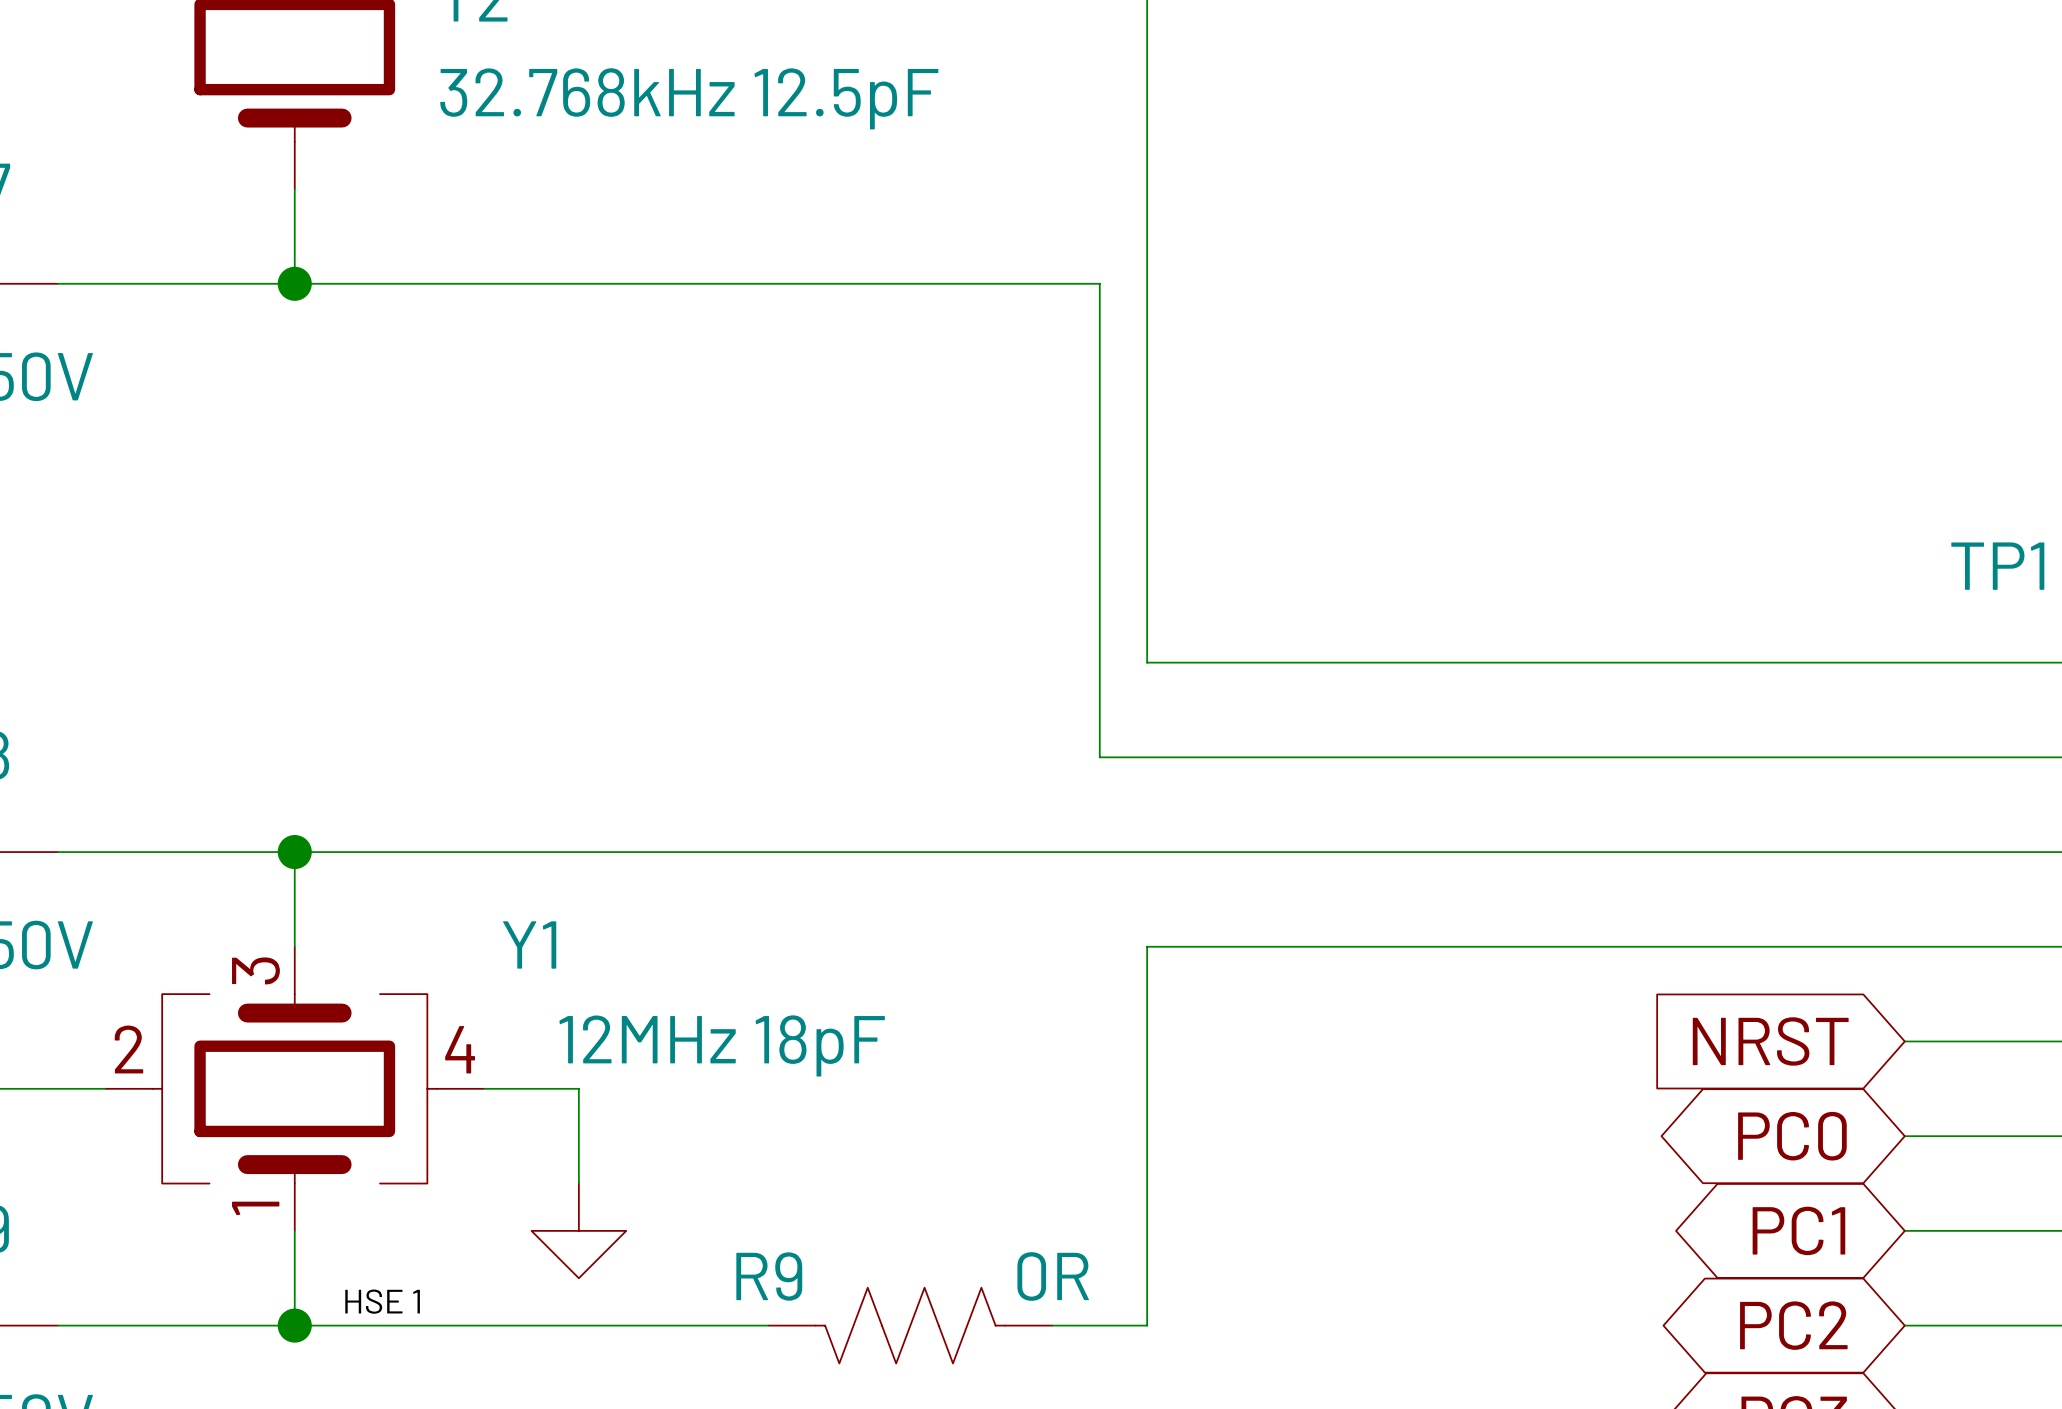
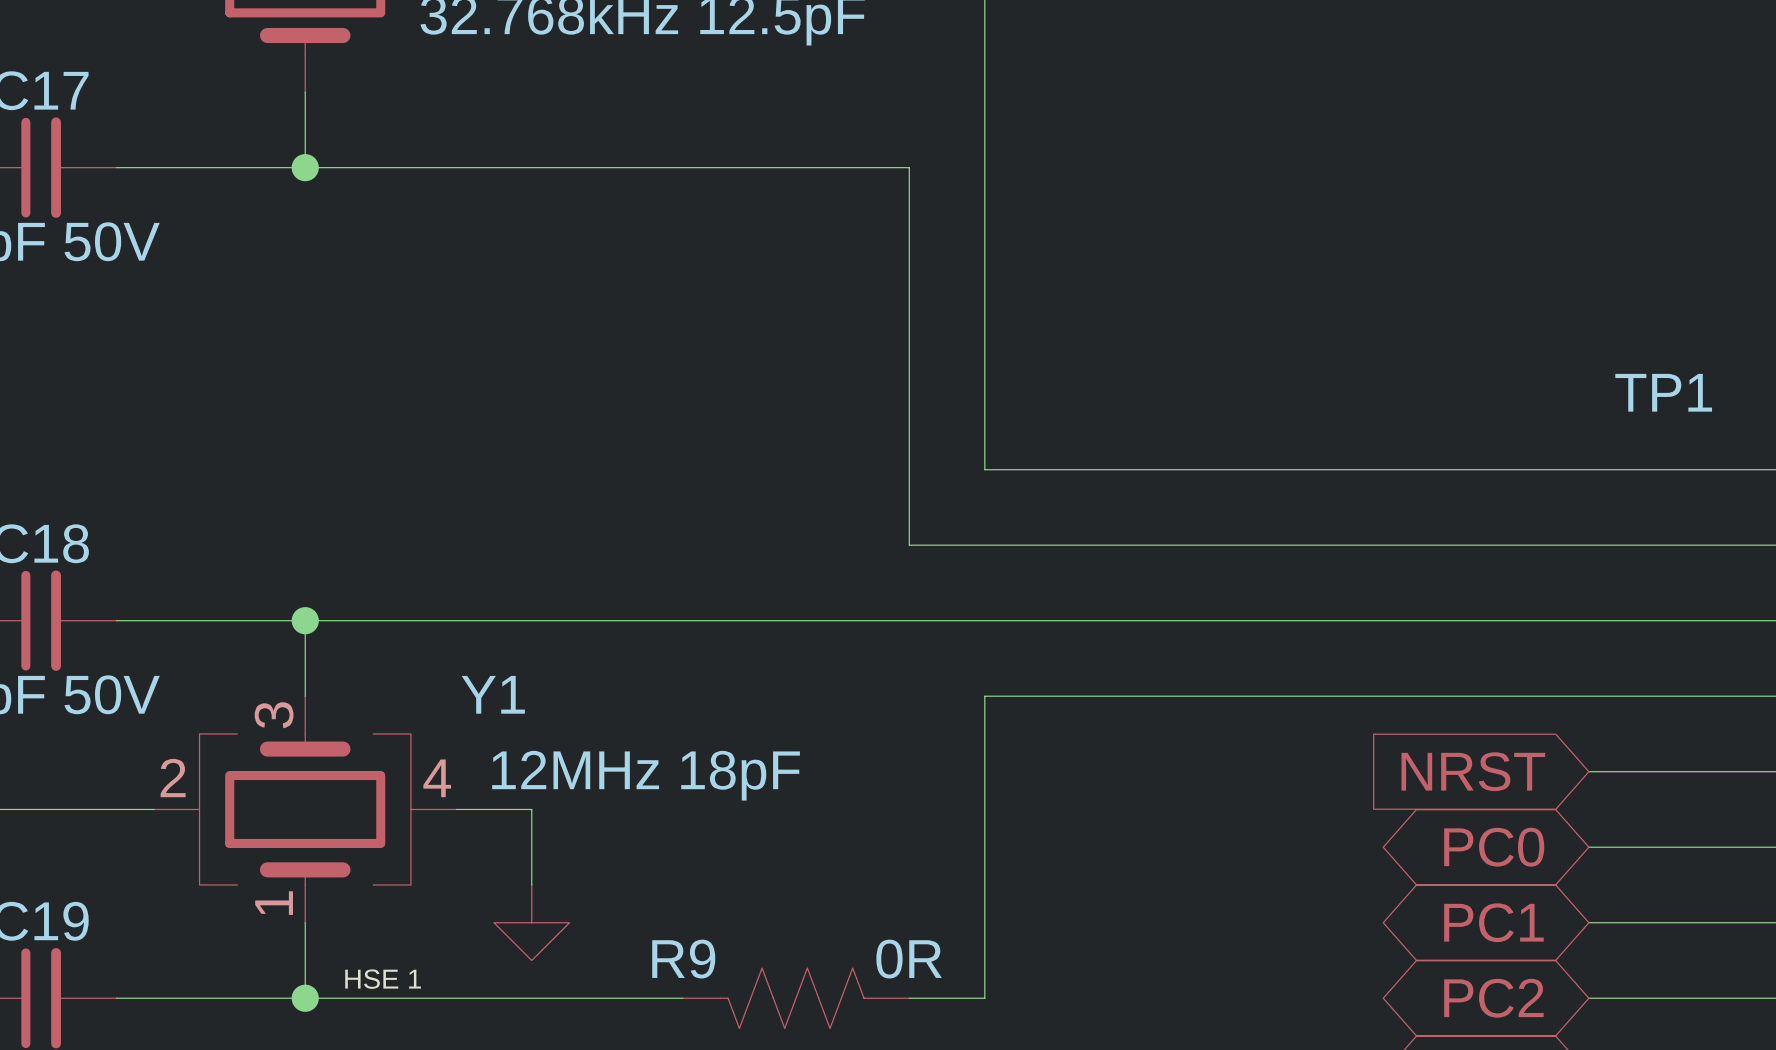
wire: (1052, 283) (1099, 283) (1099, 757) -> (909, 167) (909, 545) (947, 545)

